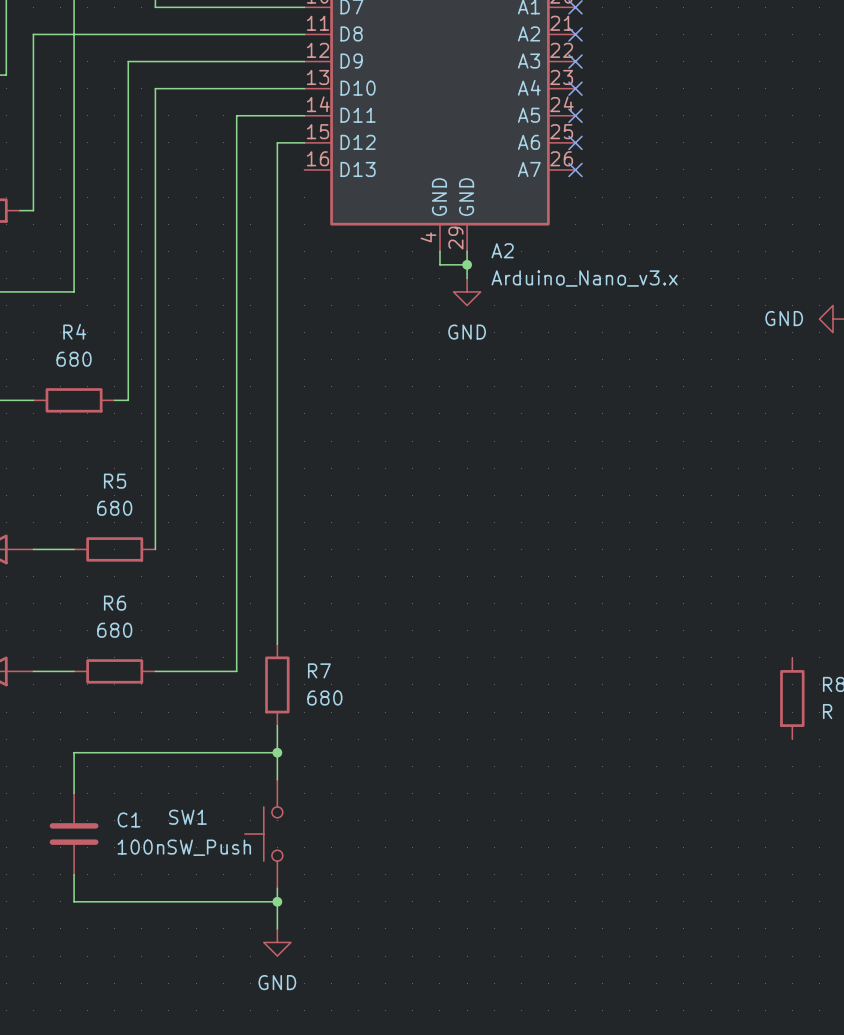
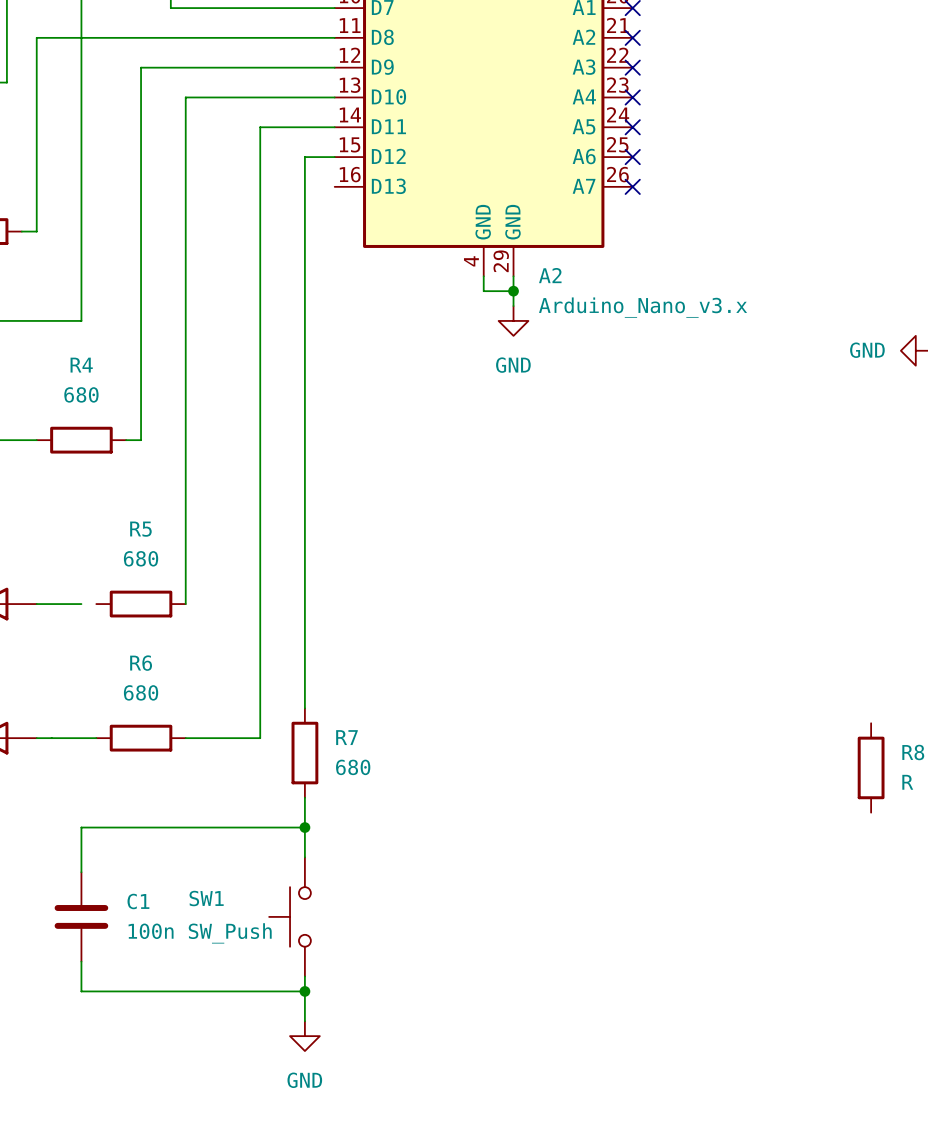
wire: (168, 88) (155, 88) (155, 549) -> (185, 97) (185, 604)
R5 position: (114, 549) -> (141, 604)
R6 position: (114, 671) -> (141, 738)

